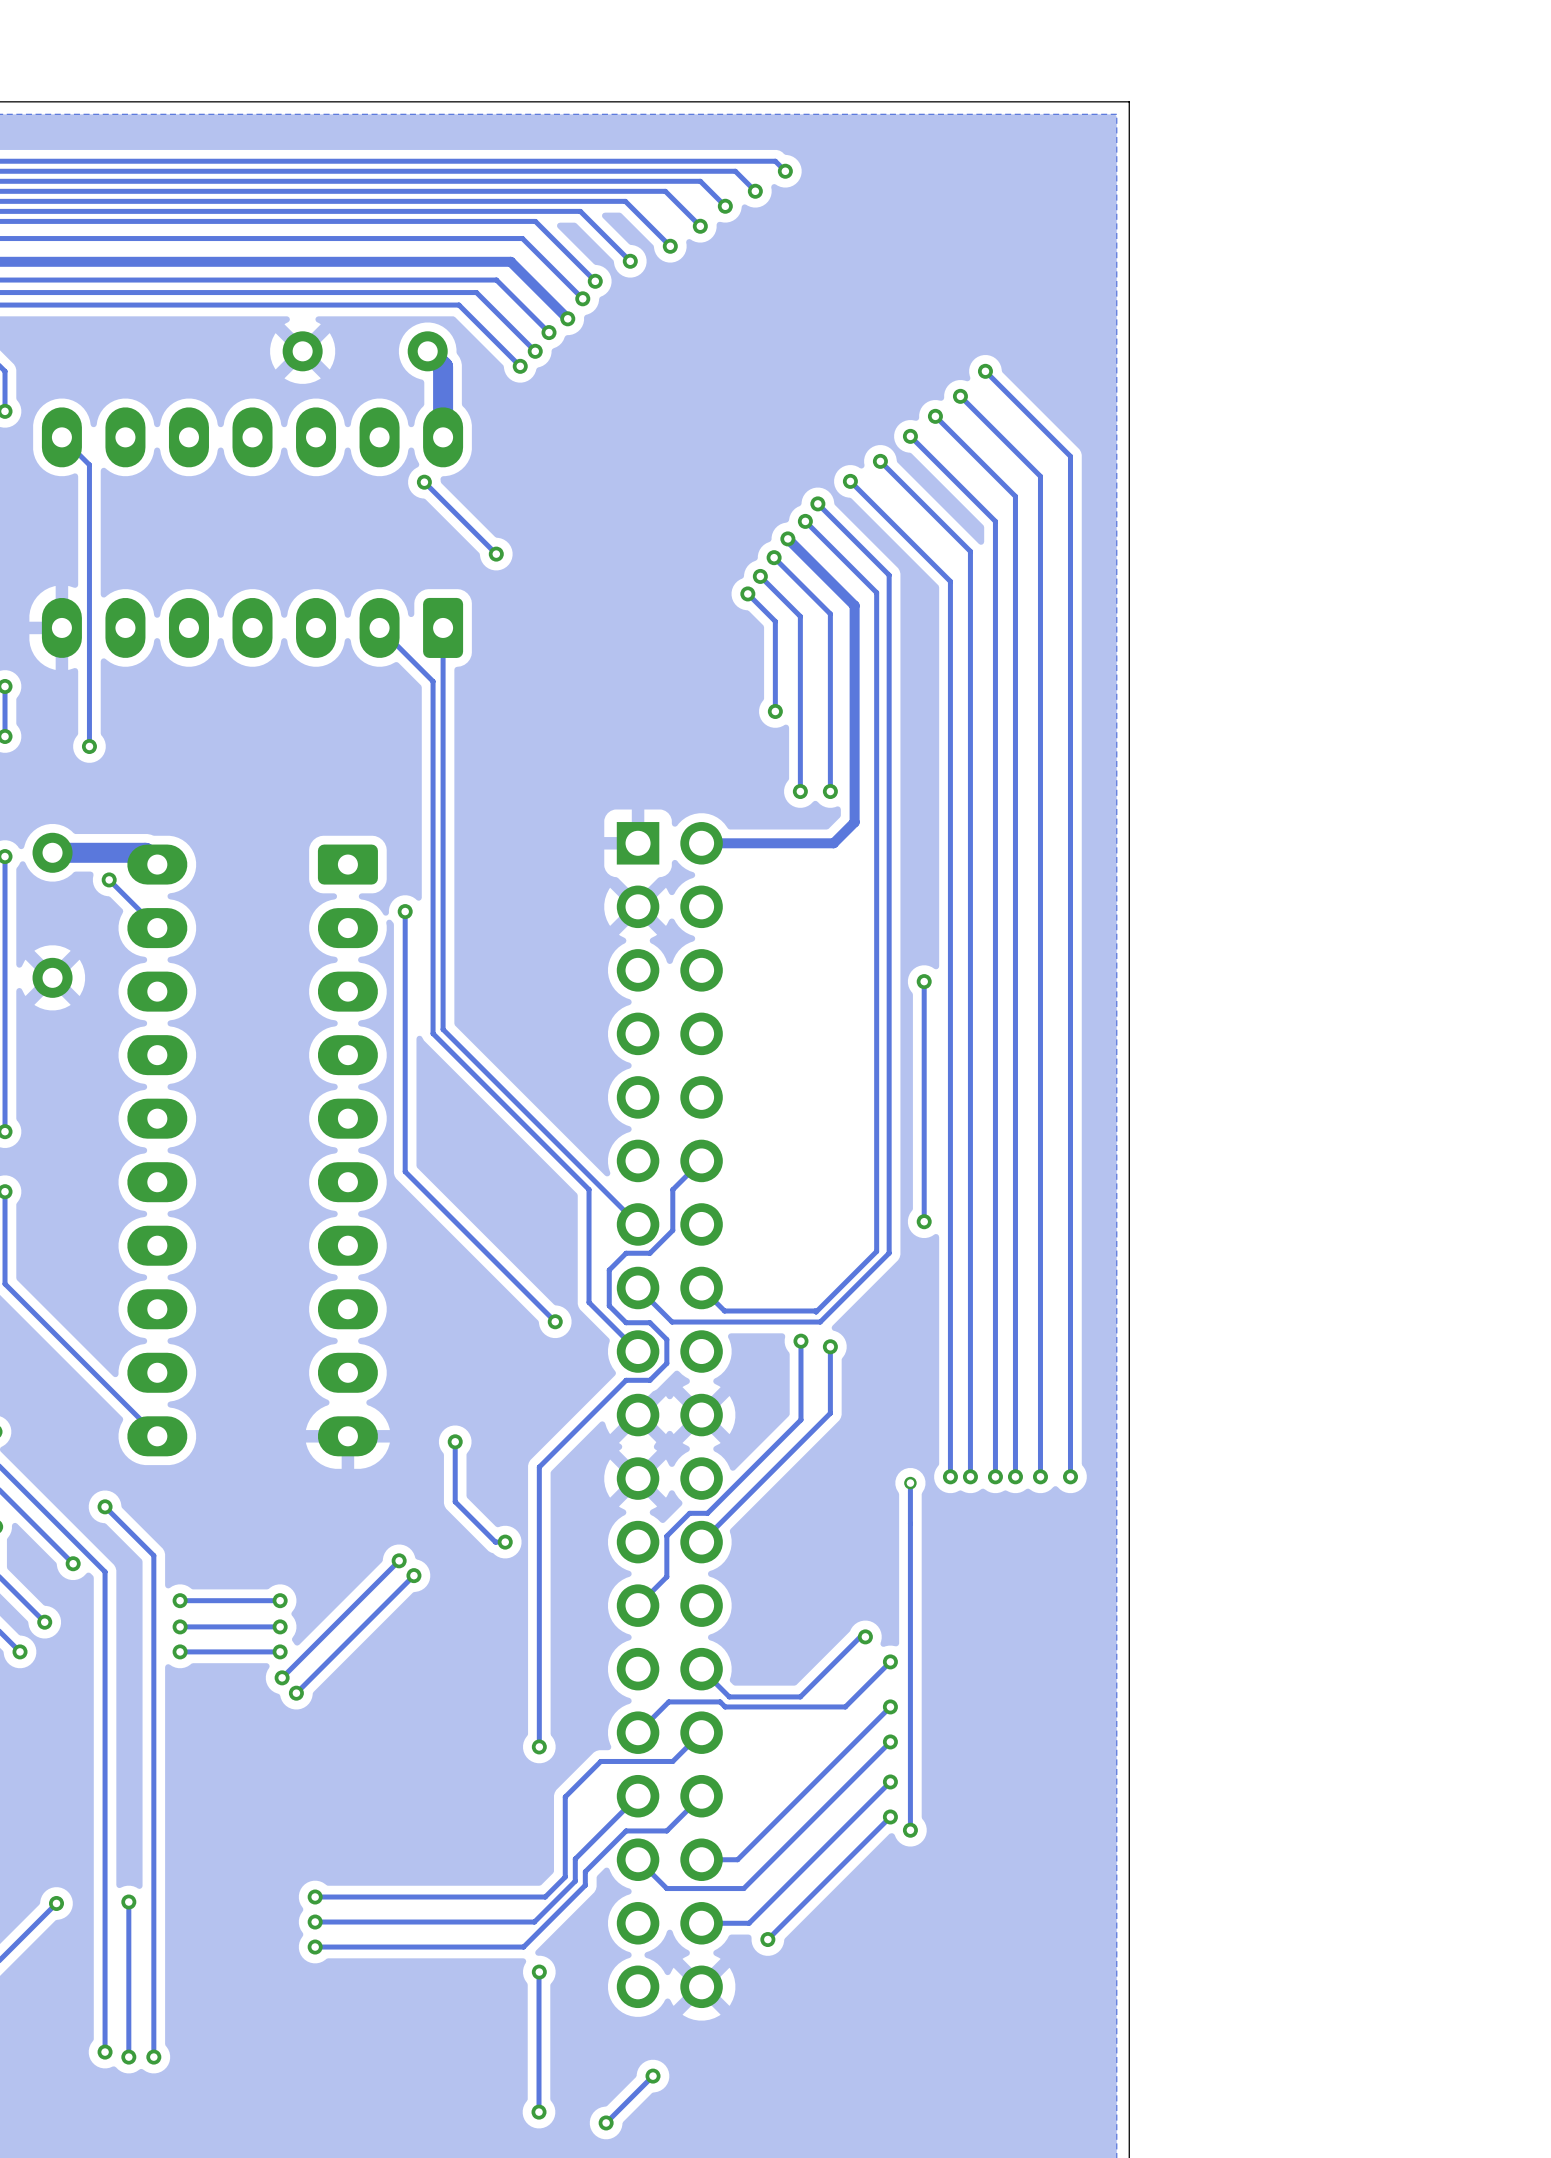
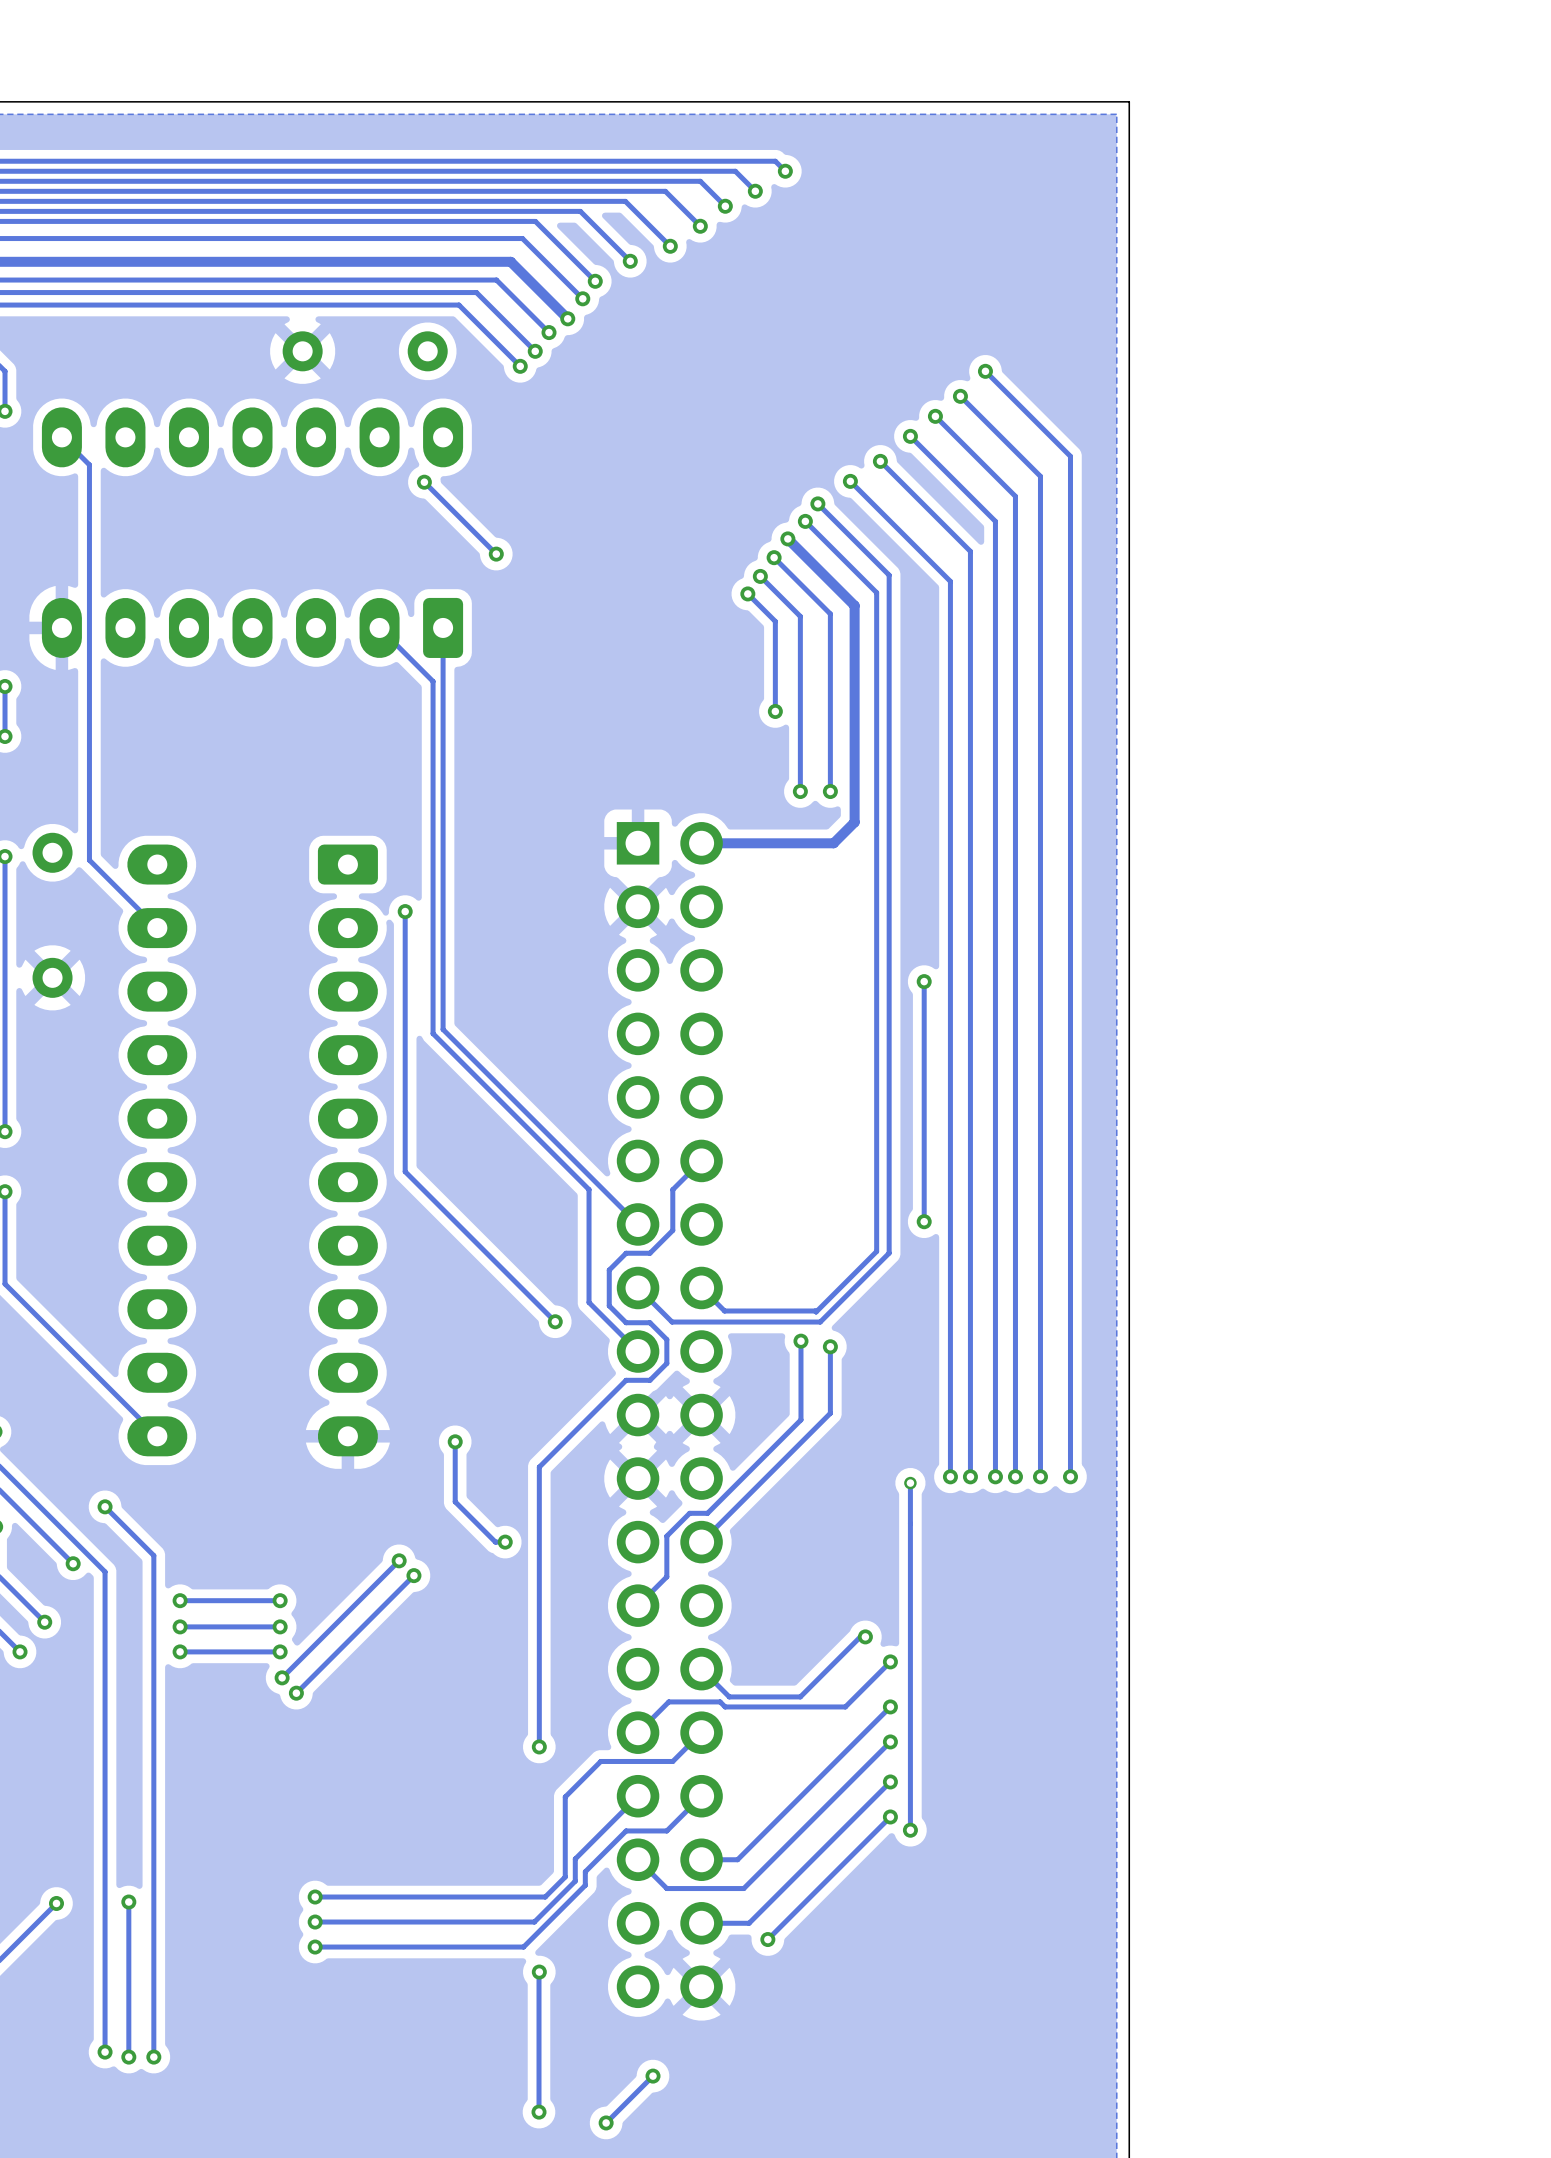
track: (427, 351) (443, 366) (443, 437) -> none
track: none -> (89, 746) (89, 860) (109, 879)
via: (89, 746) -> none
track: (52, 852) (145, 852) (157, 864) -> none
via: (109, 879) -> none

